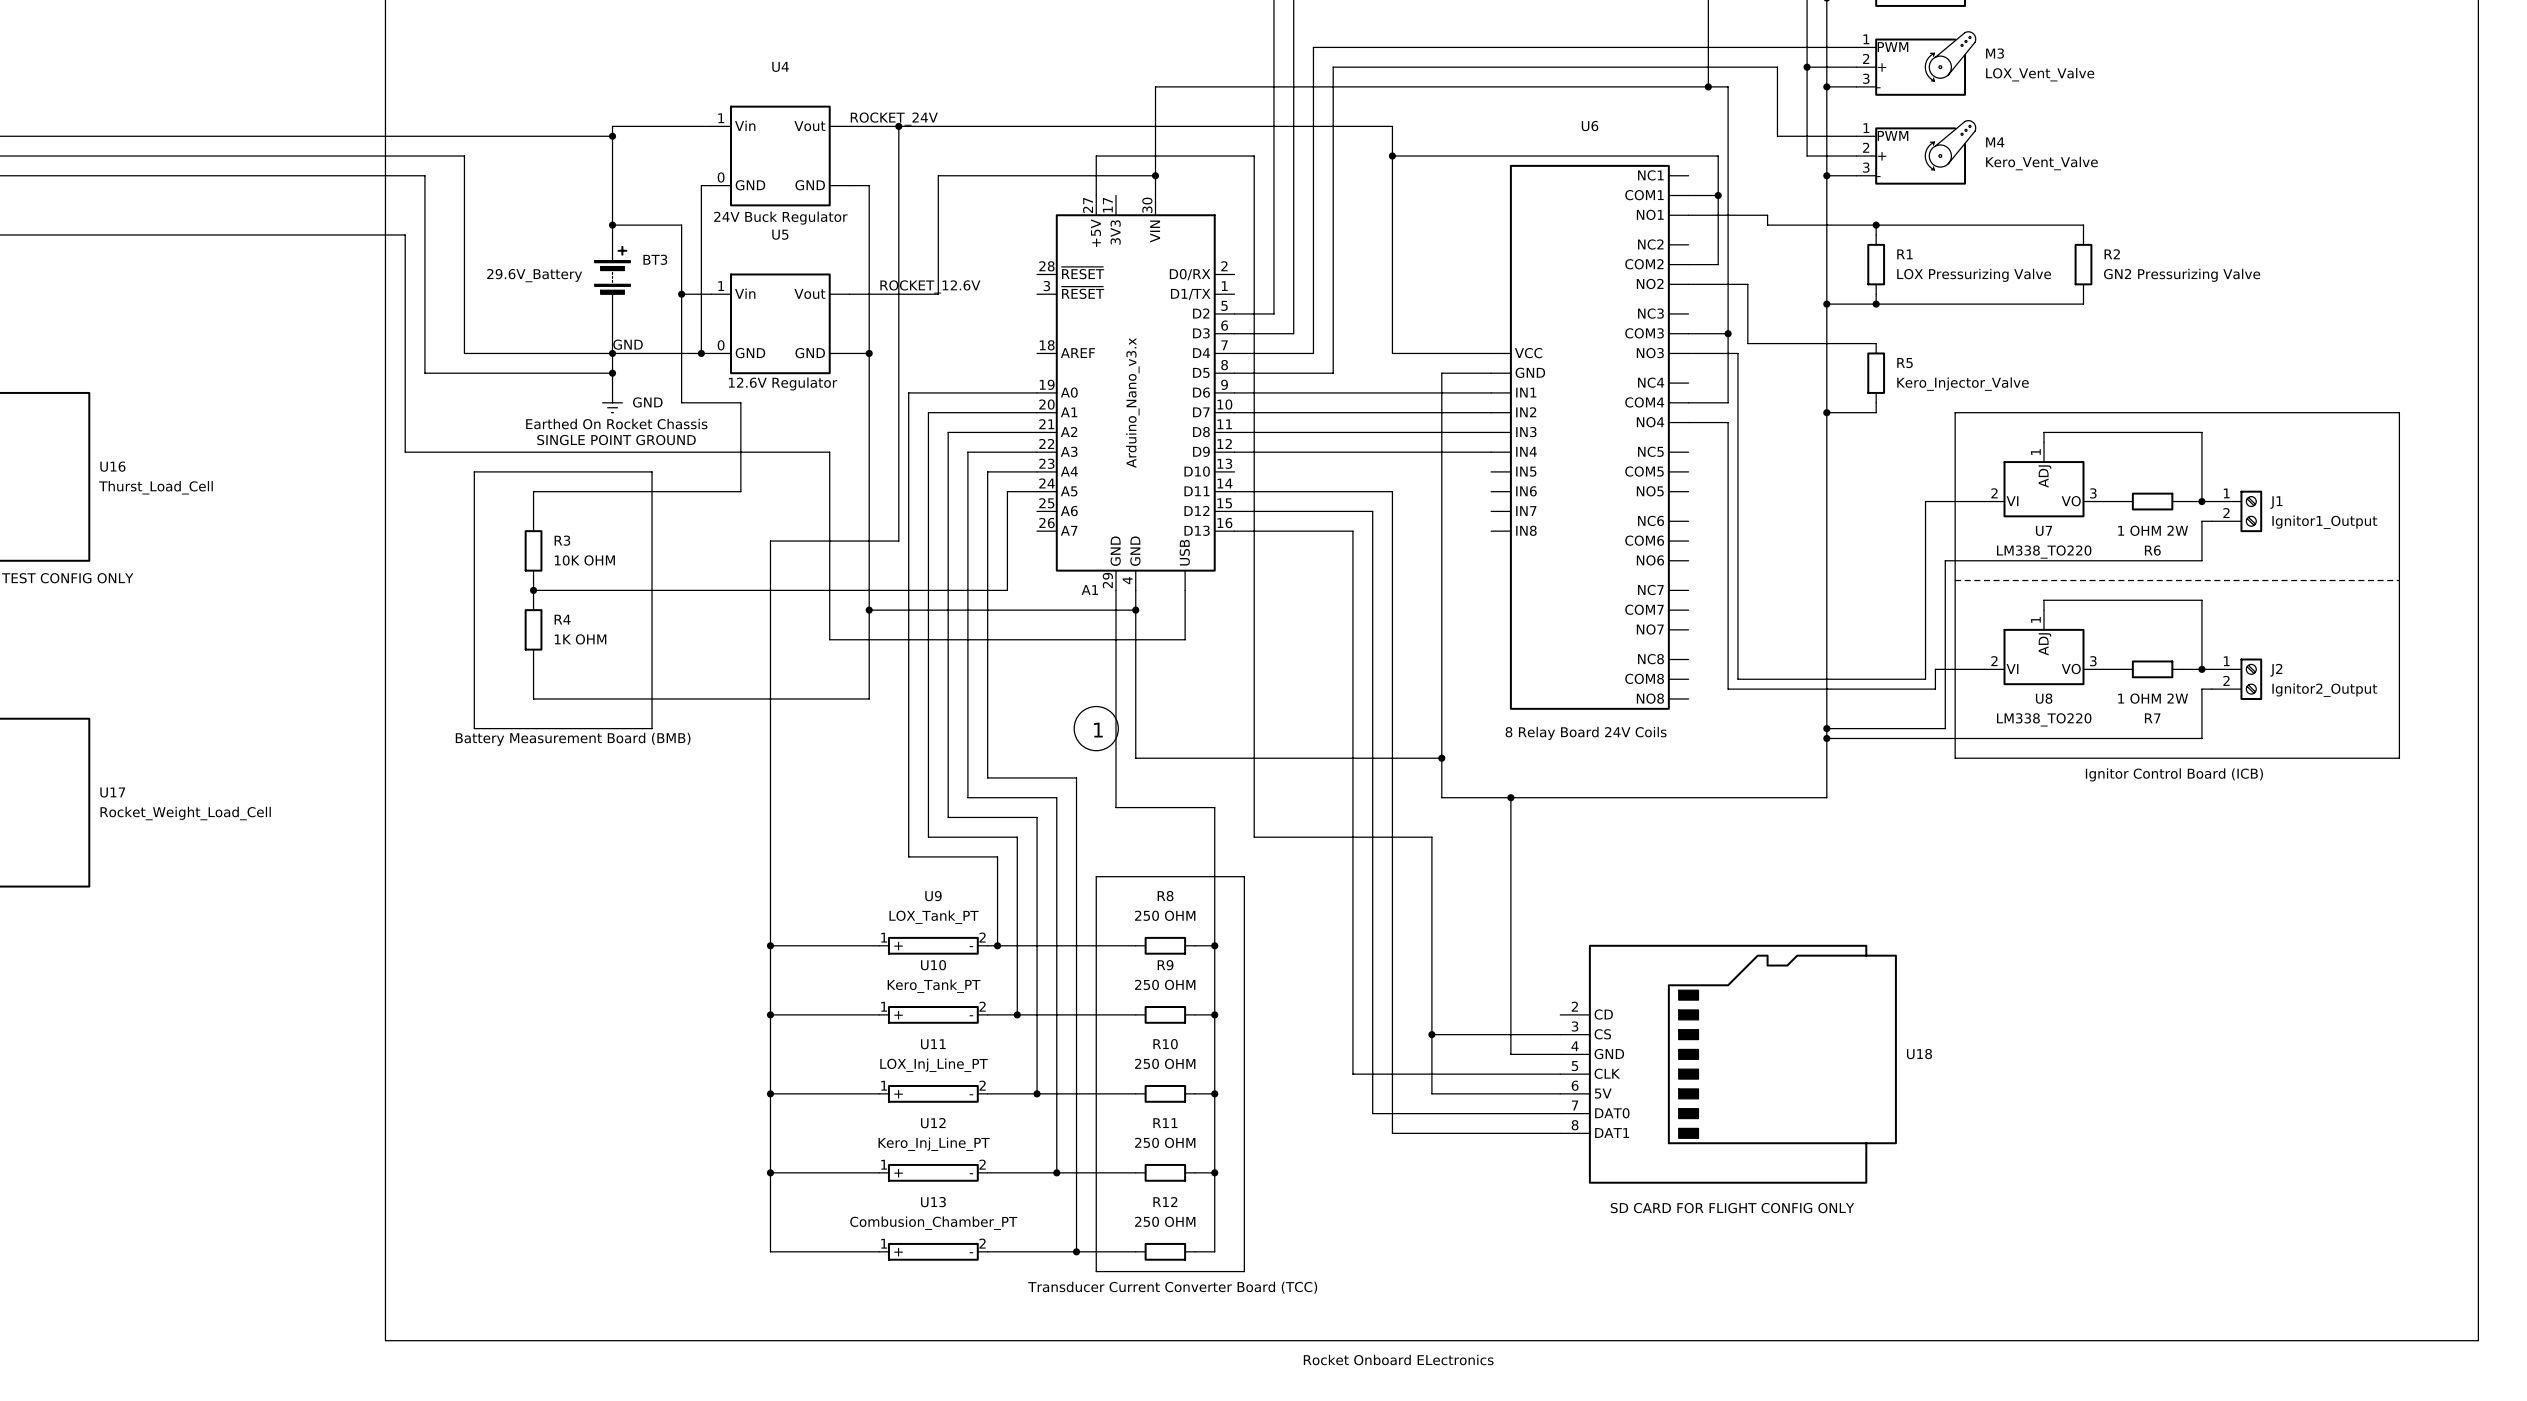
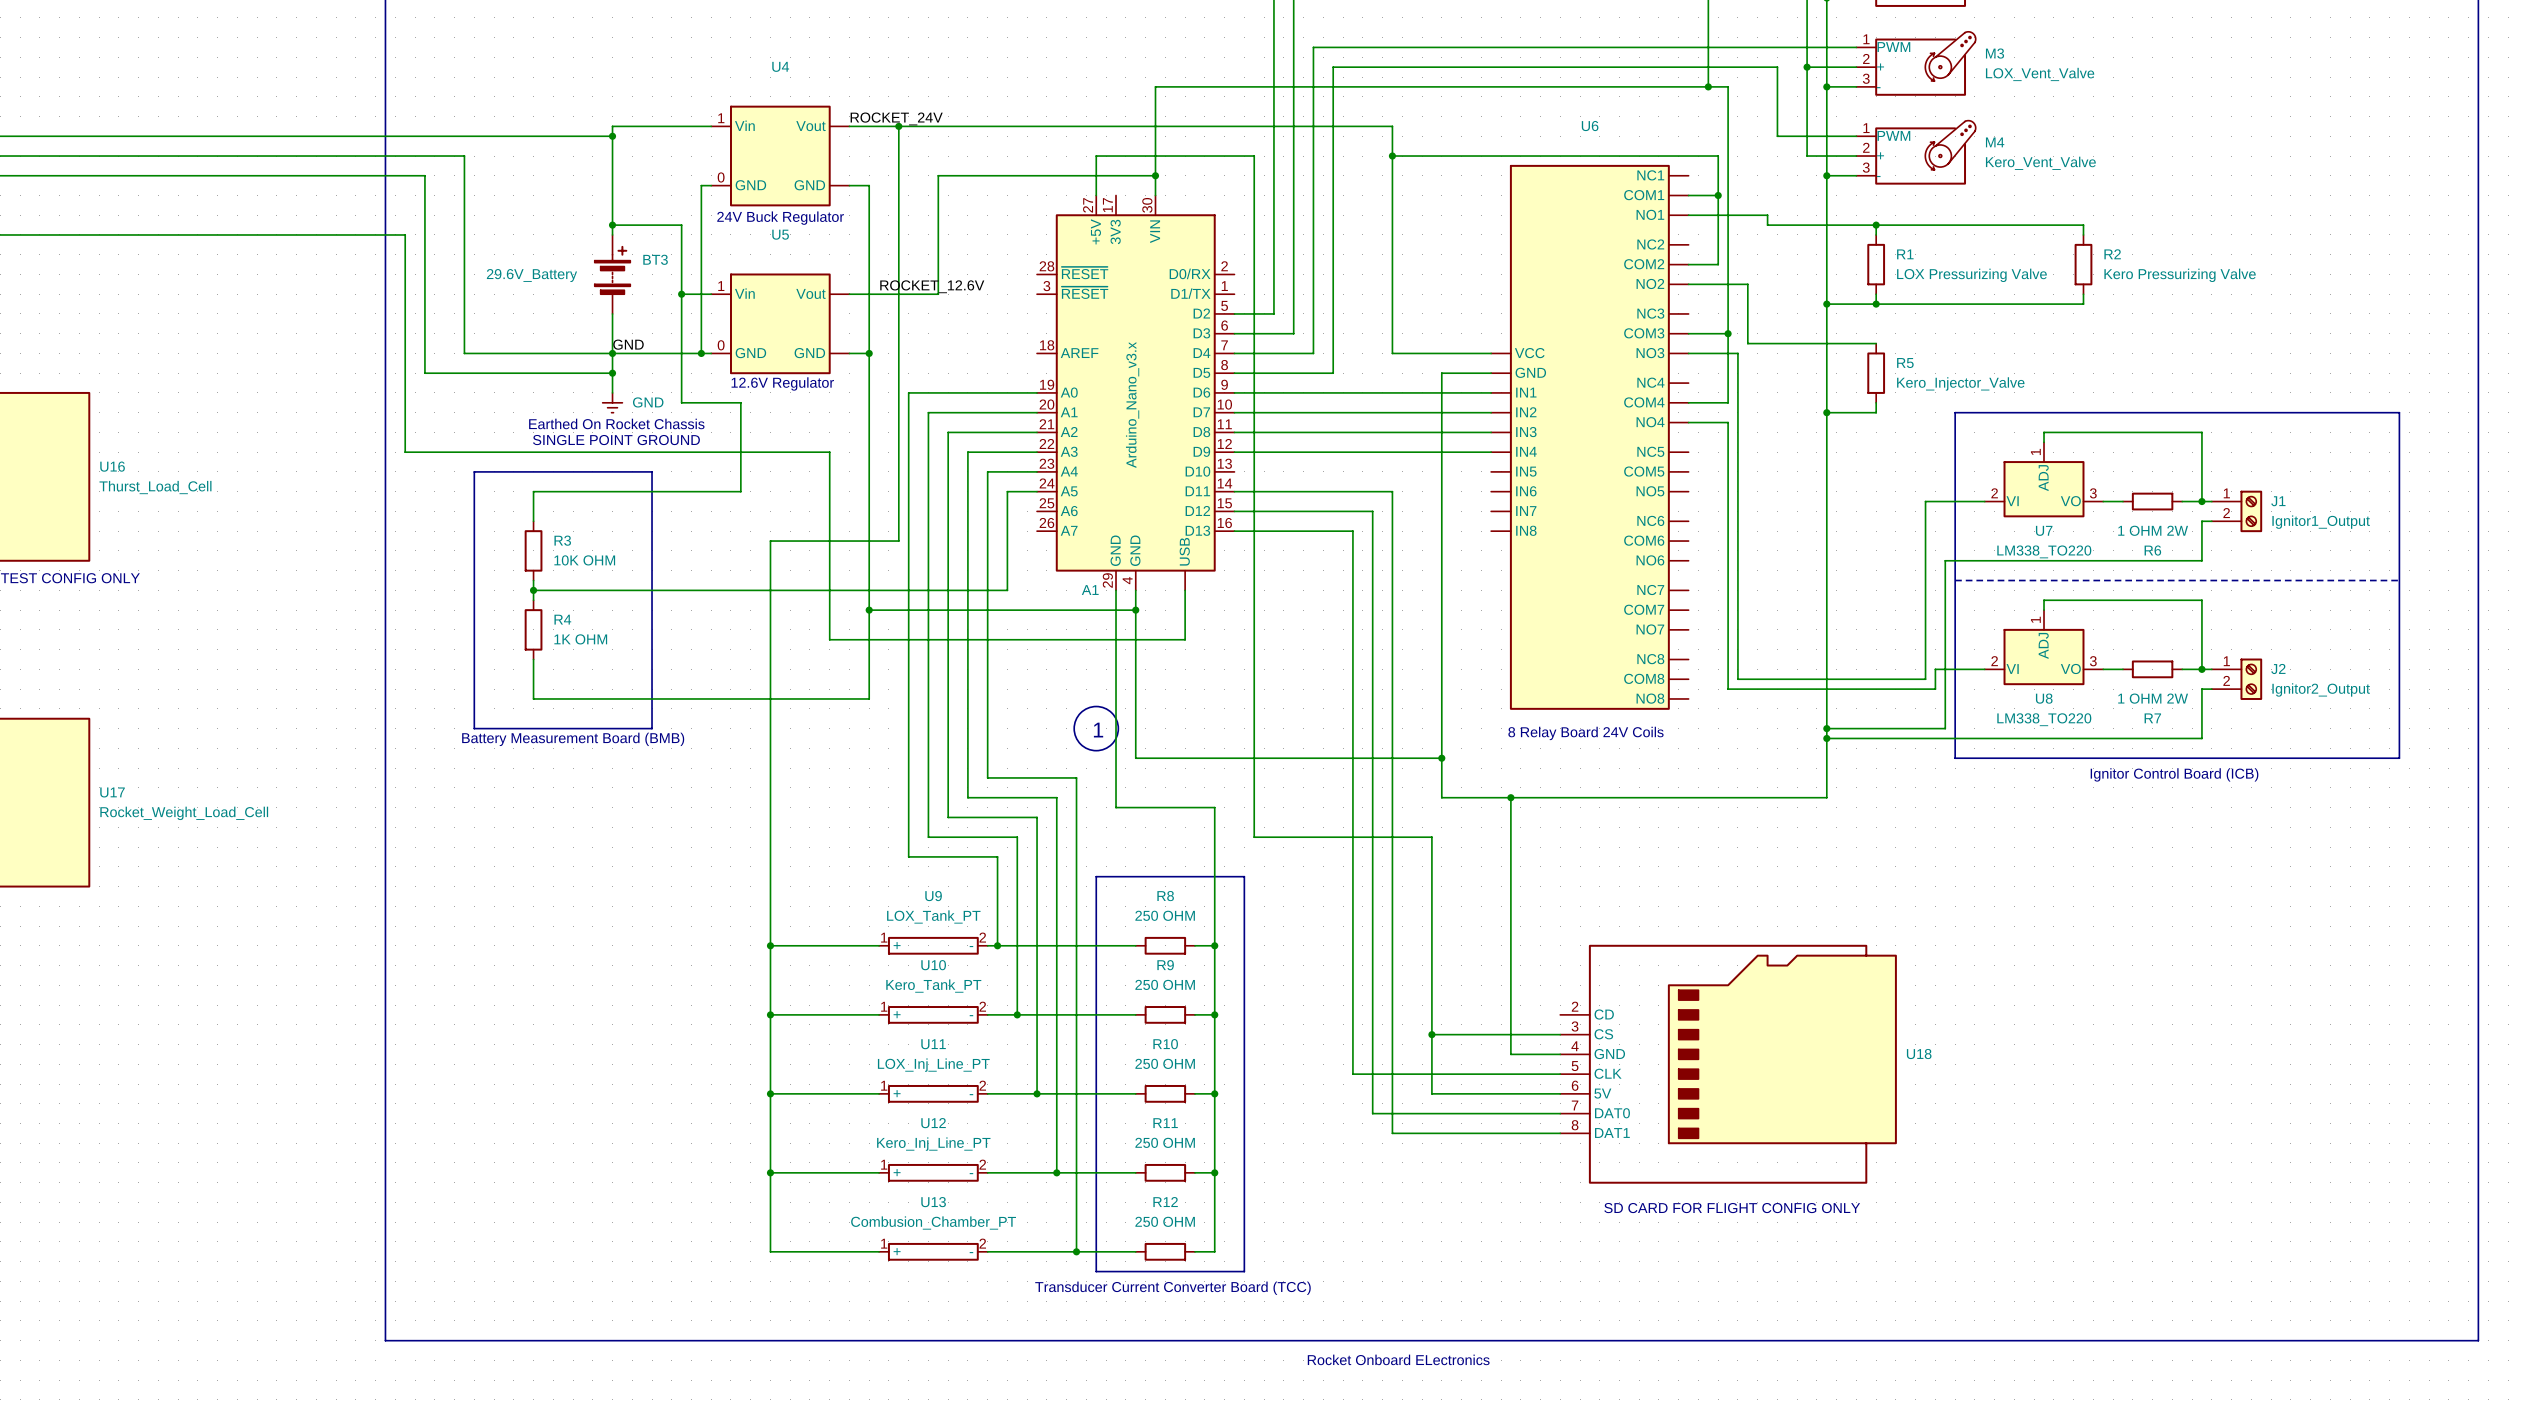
R2 value: GN2 Pressurizing Valve (2182, 275) -> Kero Pressurizing Valve (2180, 275)

